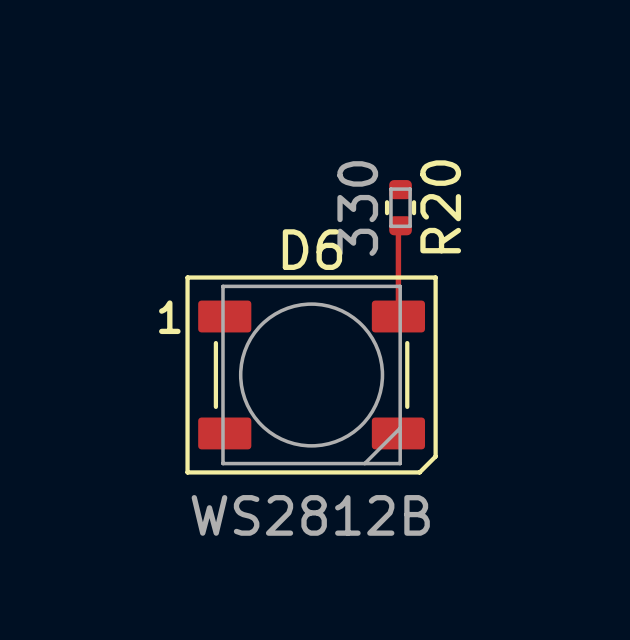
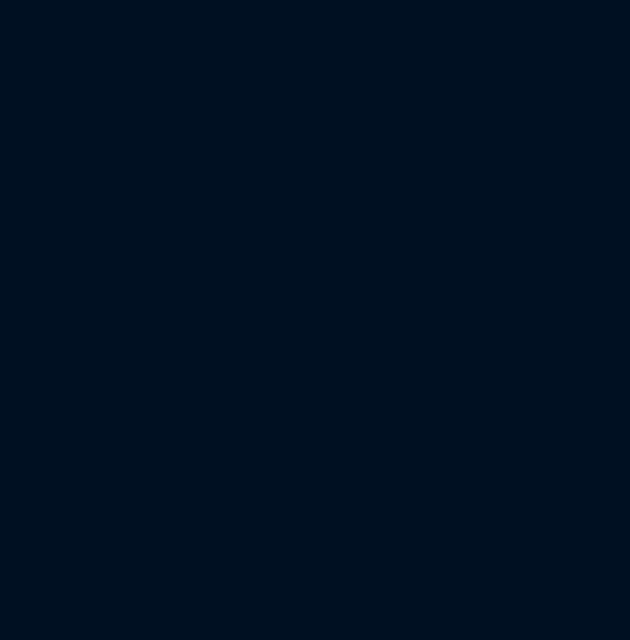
R20: 330 (400, 207) -> none
top track: (400, 225) (398, 227) (398, 316) -> none
D6: WS2812B (311, 374) -> none

